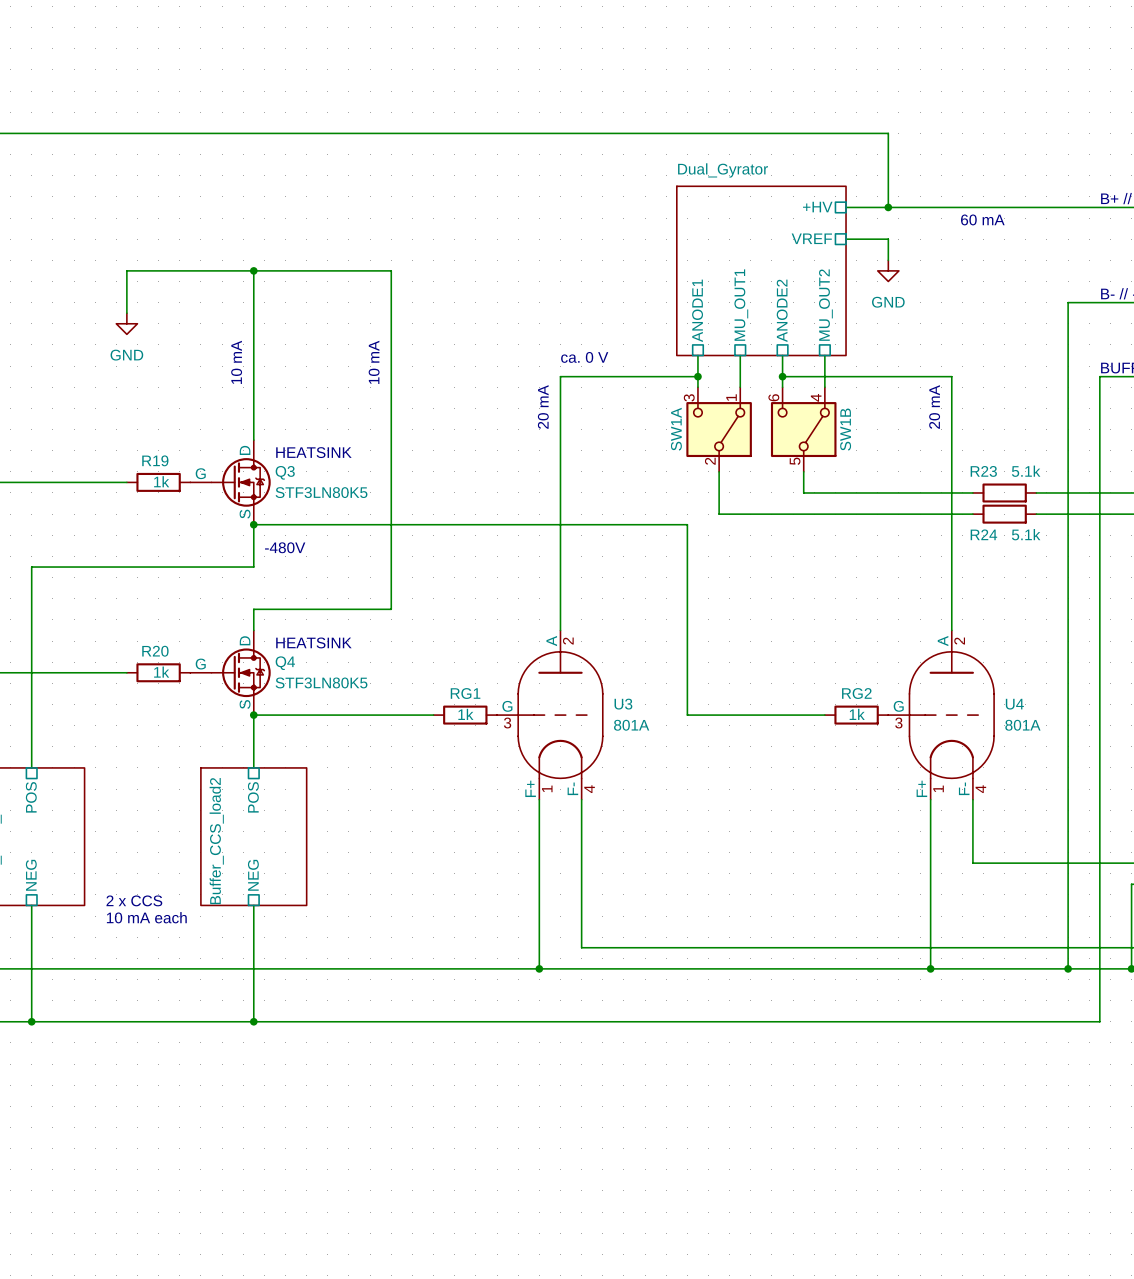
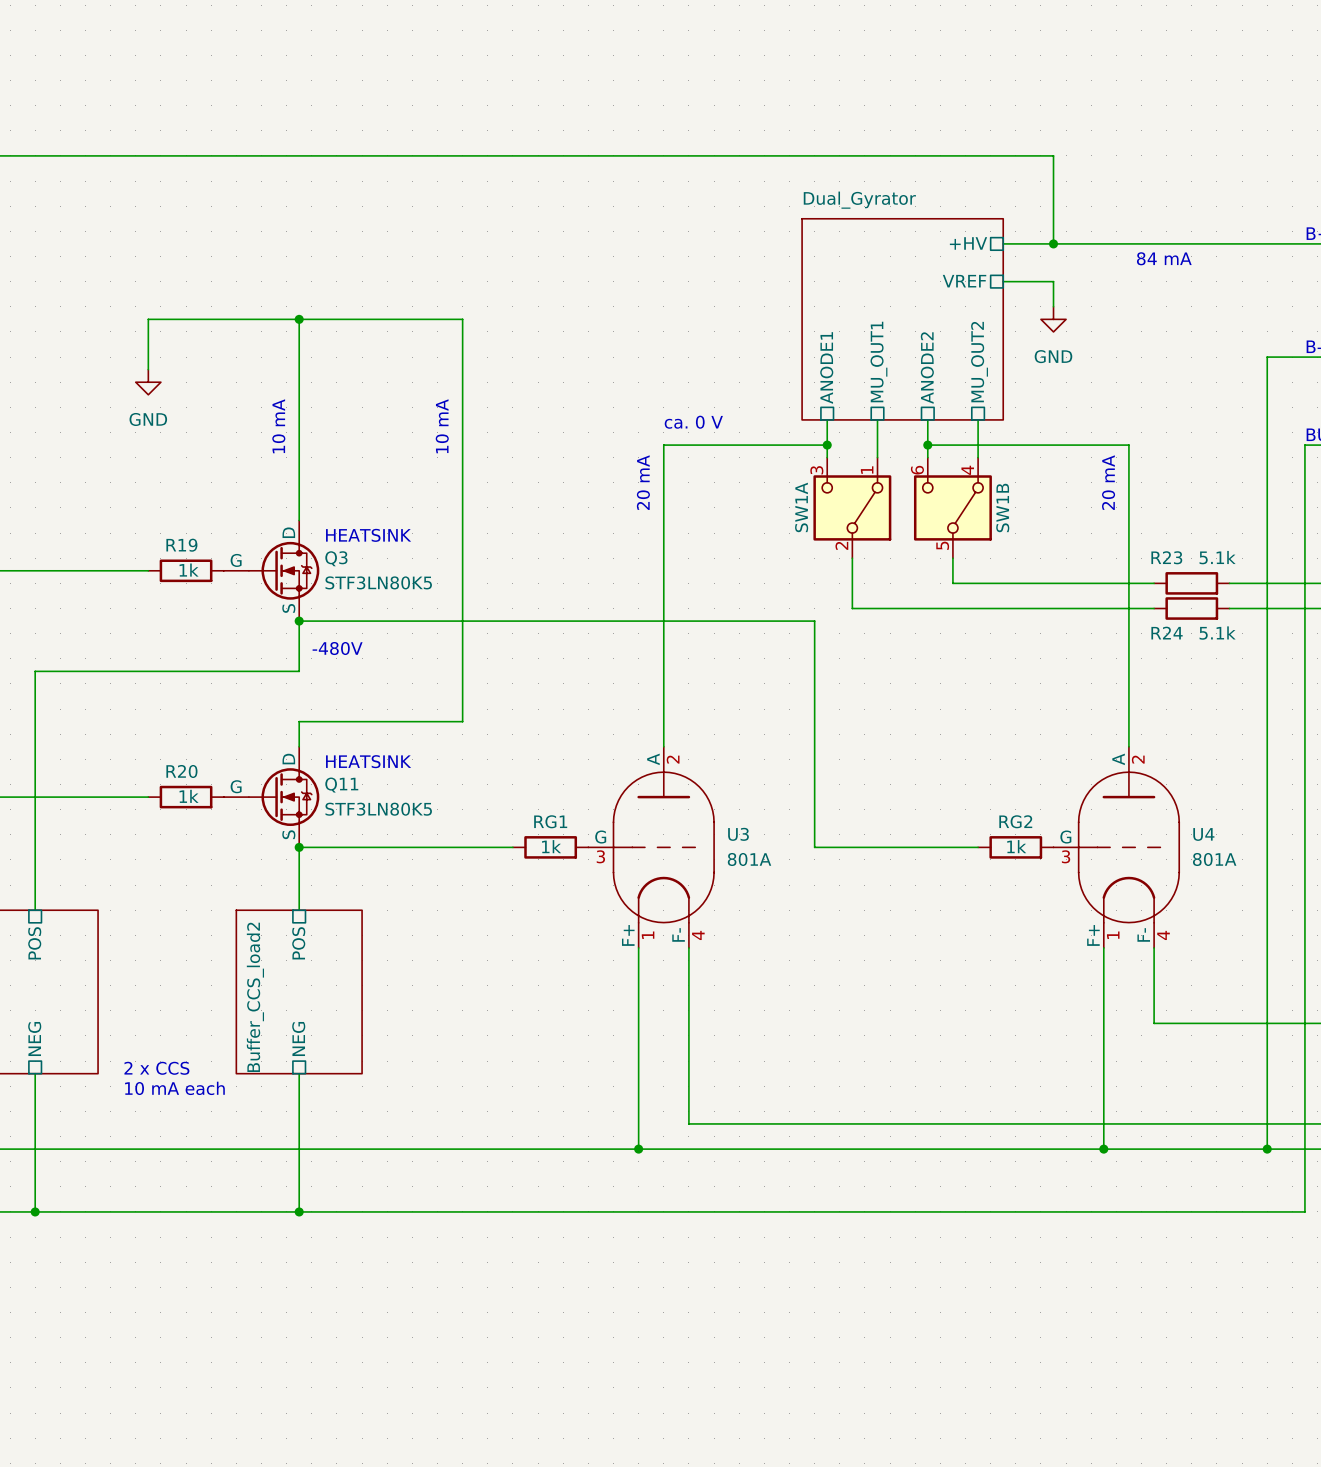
text: 60 mA (982, 219) -> 84 mA (1164, 258)
Q4 name: Q4 (285, 663) -> Q11 (341, 785)

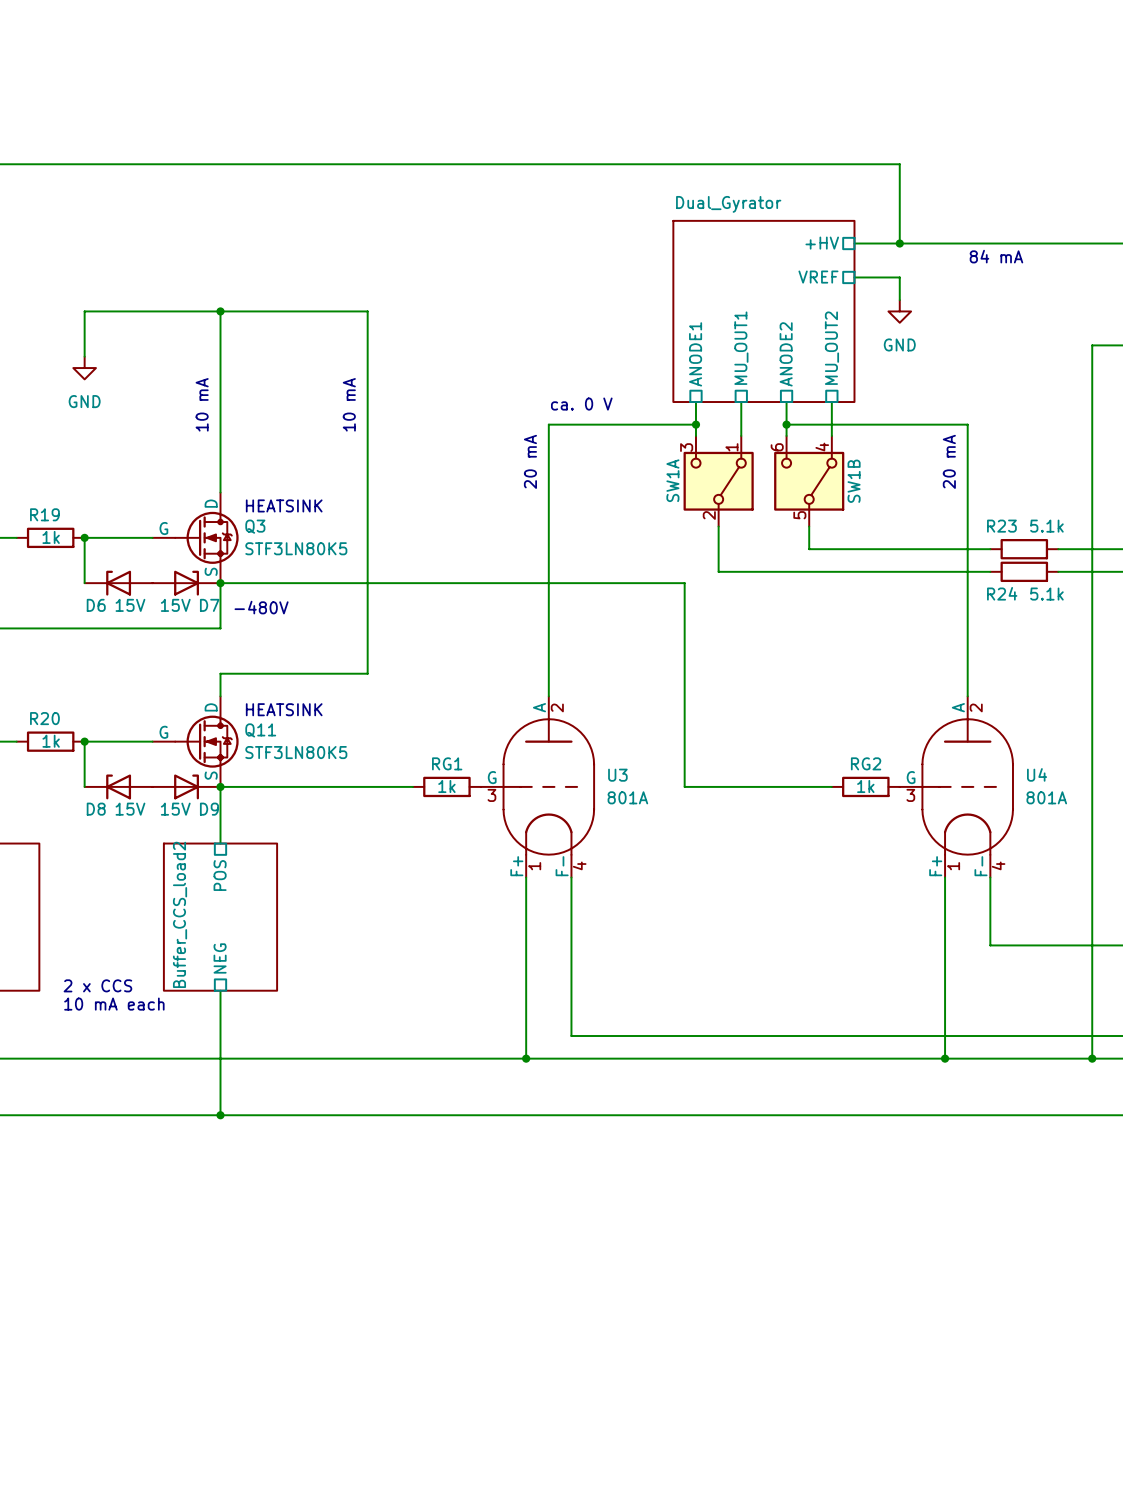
wire: (72, 570) (148, 570) -> none
junction: none -> (84, 537)
R19 position: (186, 570) -> (50, 537)
wire: none -> (152, 537) (84, 537) (84, 583)
D6: none -> 15V (118, 583)
D7: none -> 15V (186, 583)
wire: (72, 797) (148, 797) -> none
junction: none -> (84, 741)
R20 position: (186, 797) -> (50, 741)
wire: none -> (152, 741) (84, 741) (84, 786)
D8: none -> 15V (118, 786)
D9: none -> 15V (186, 786)

